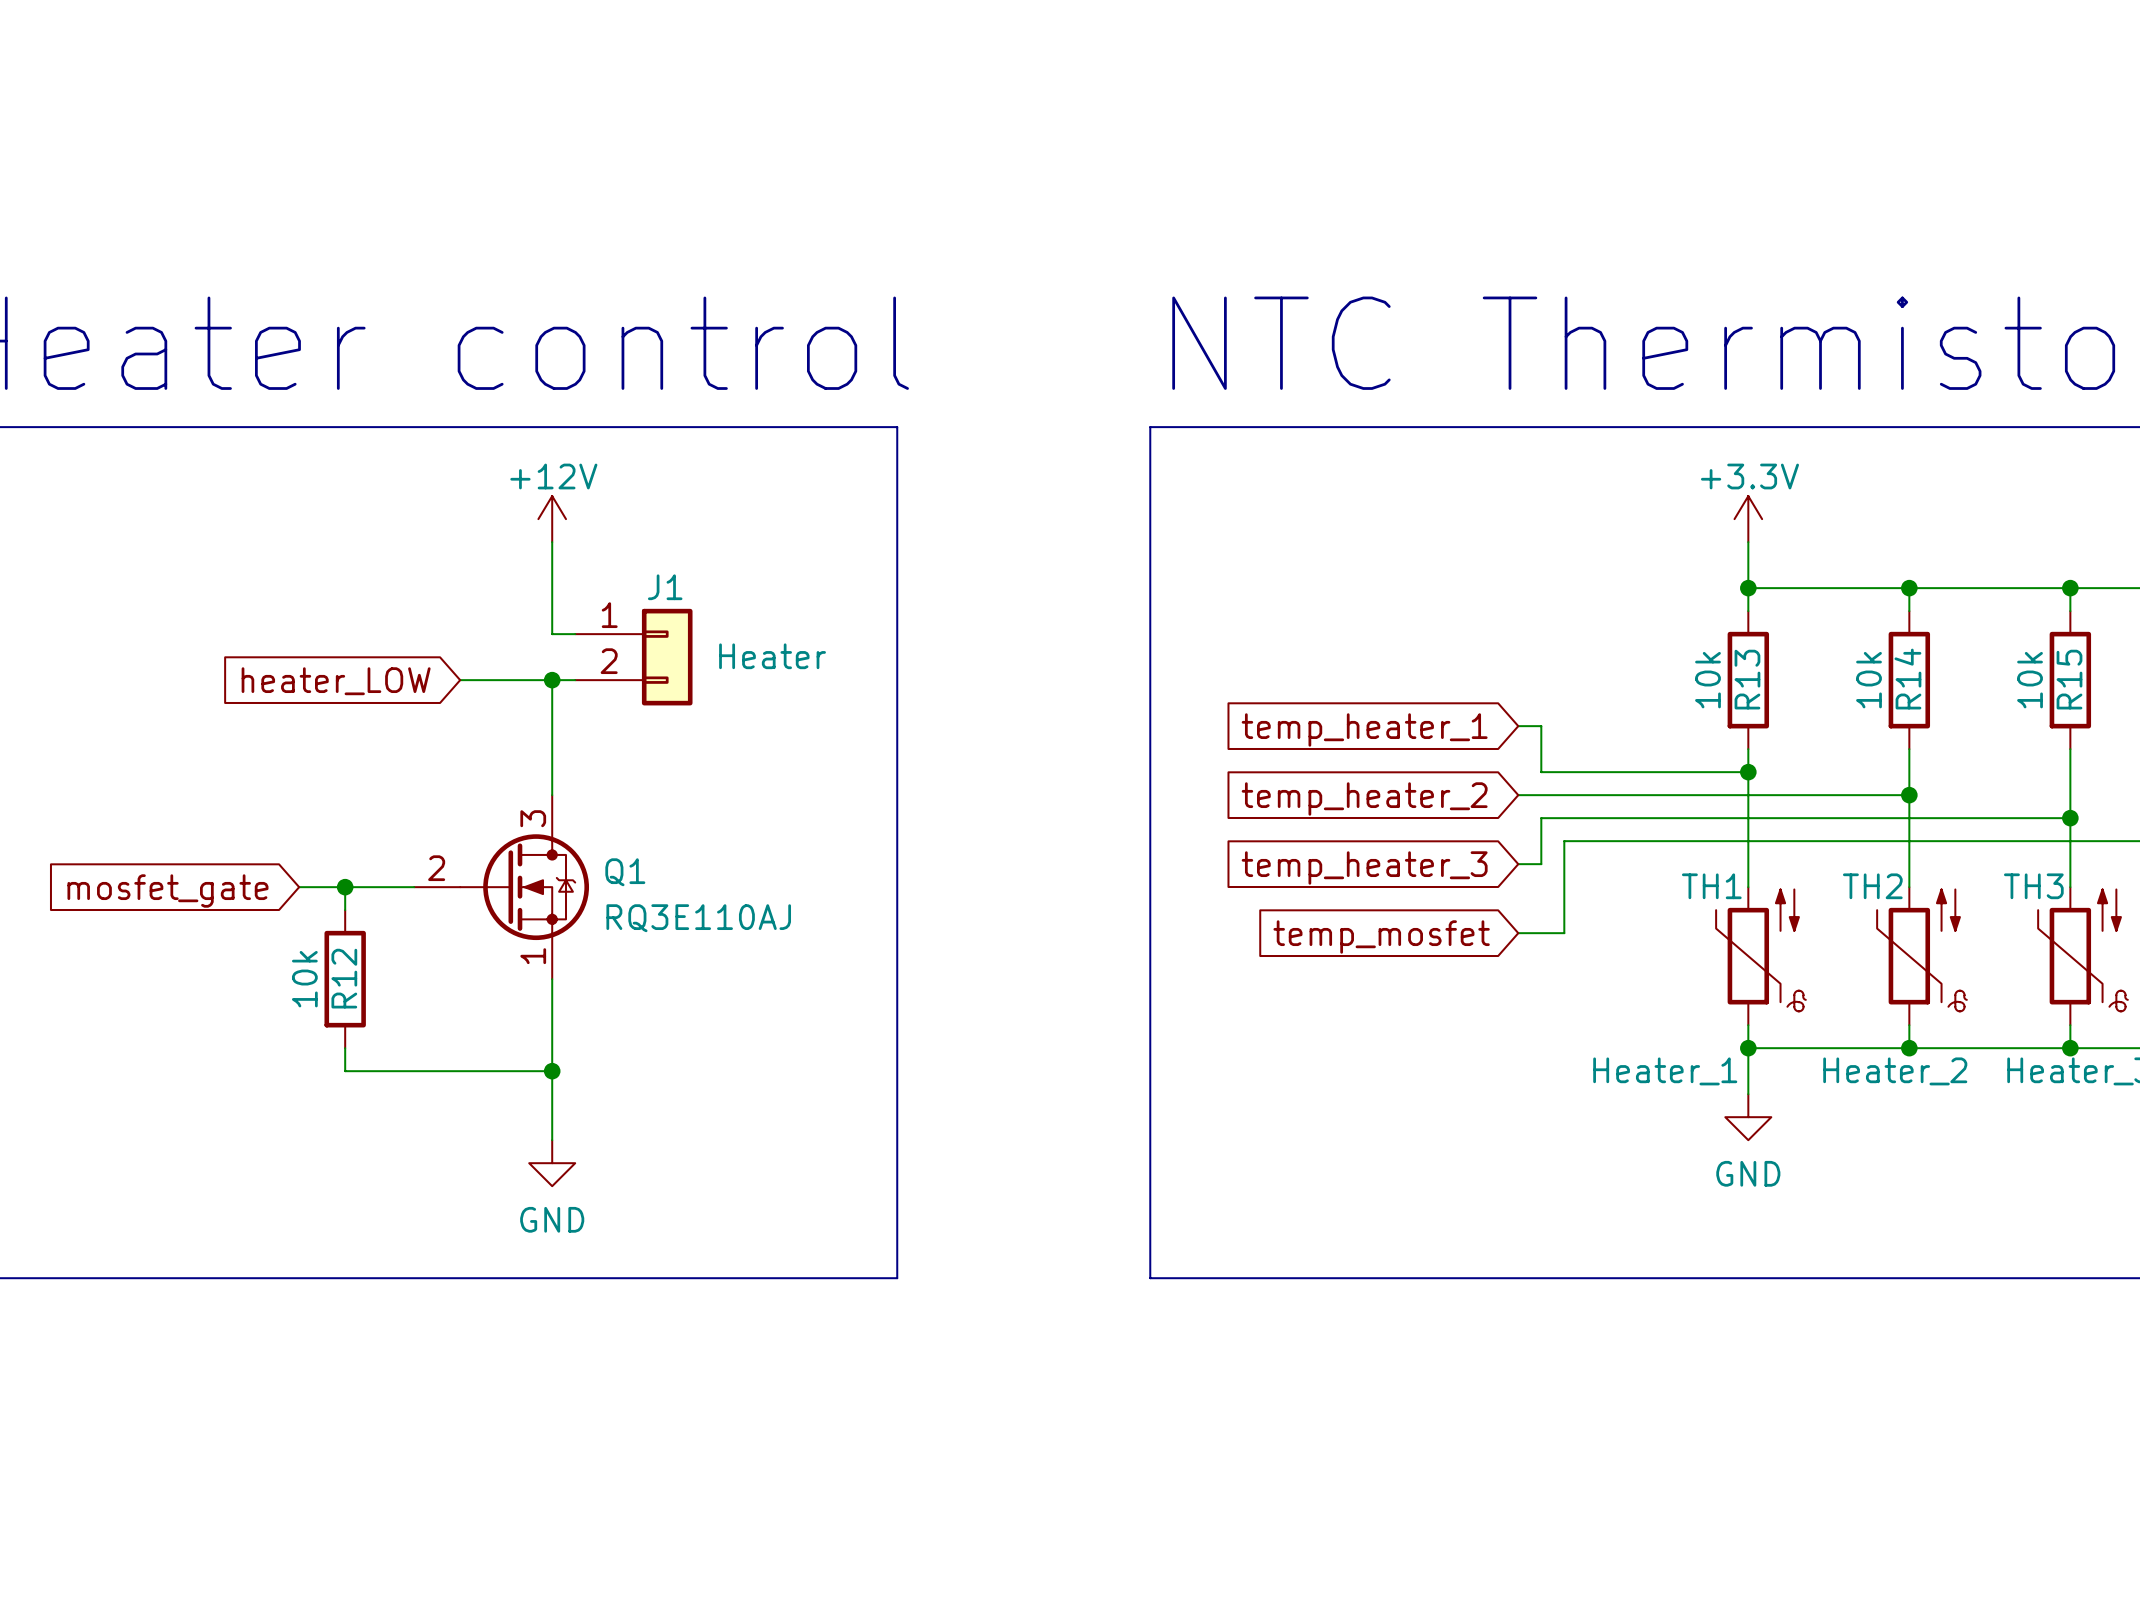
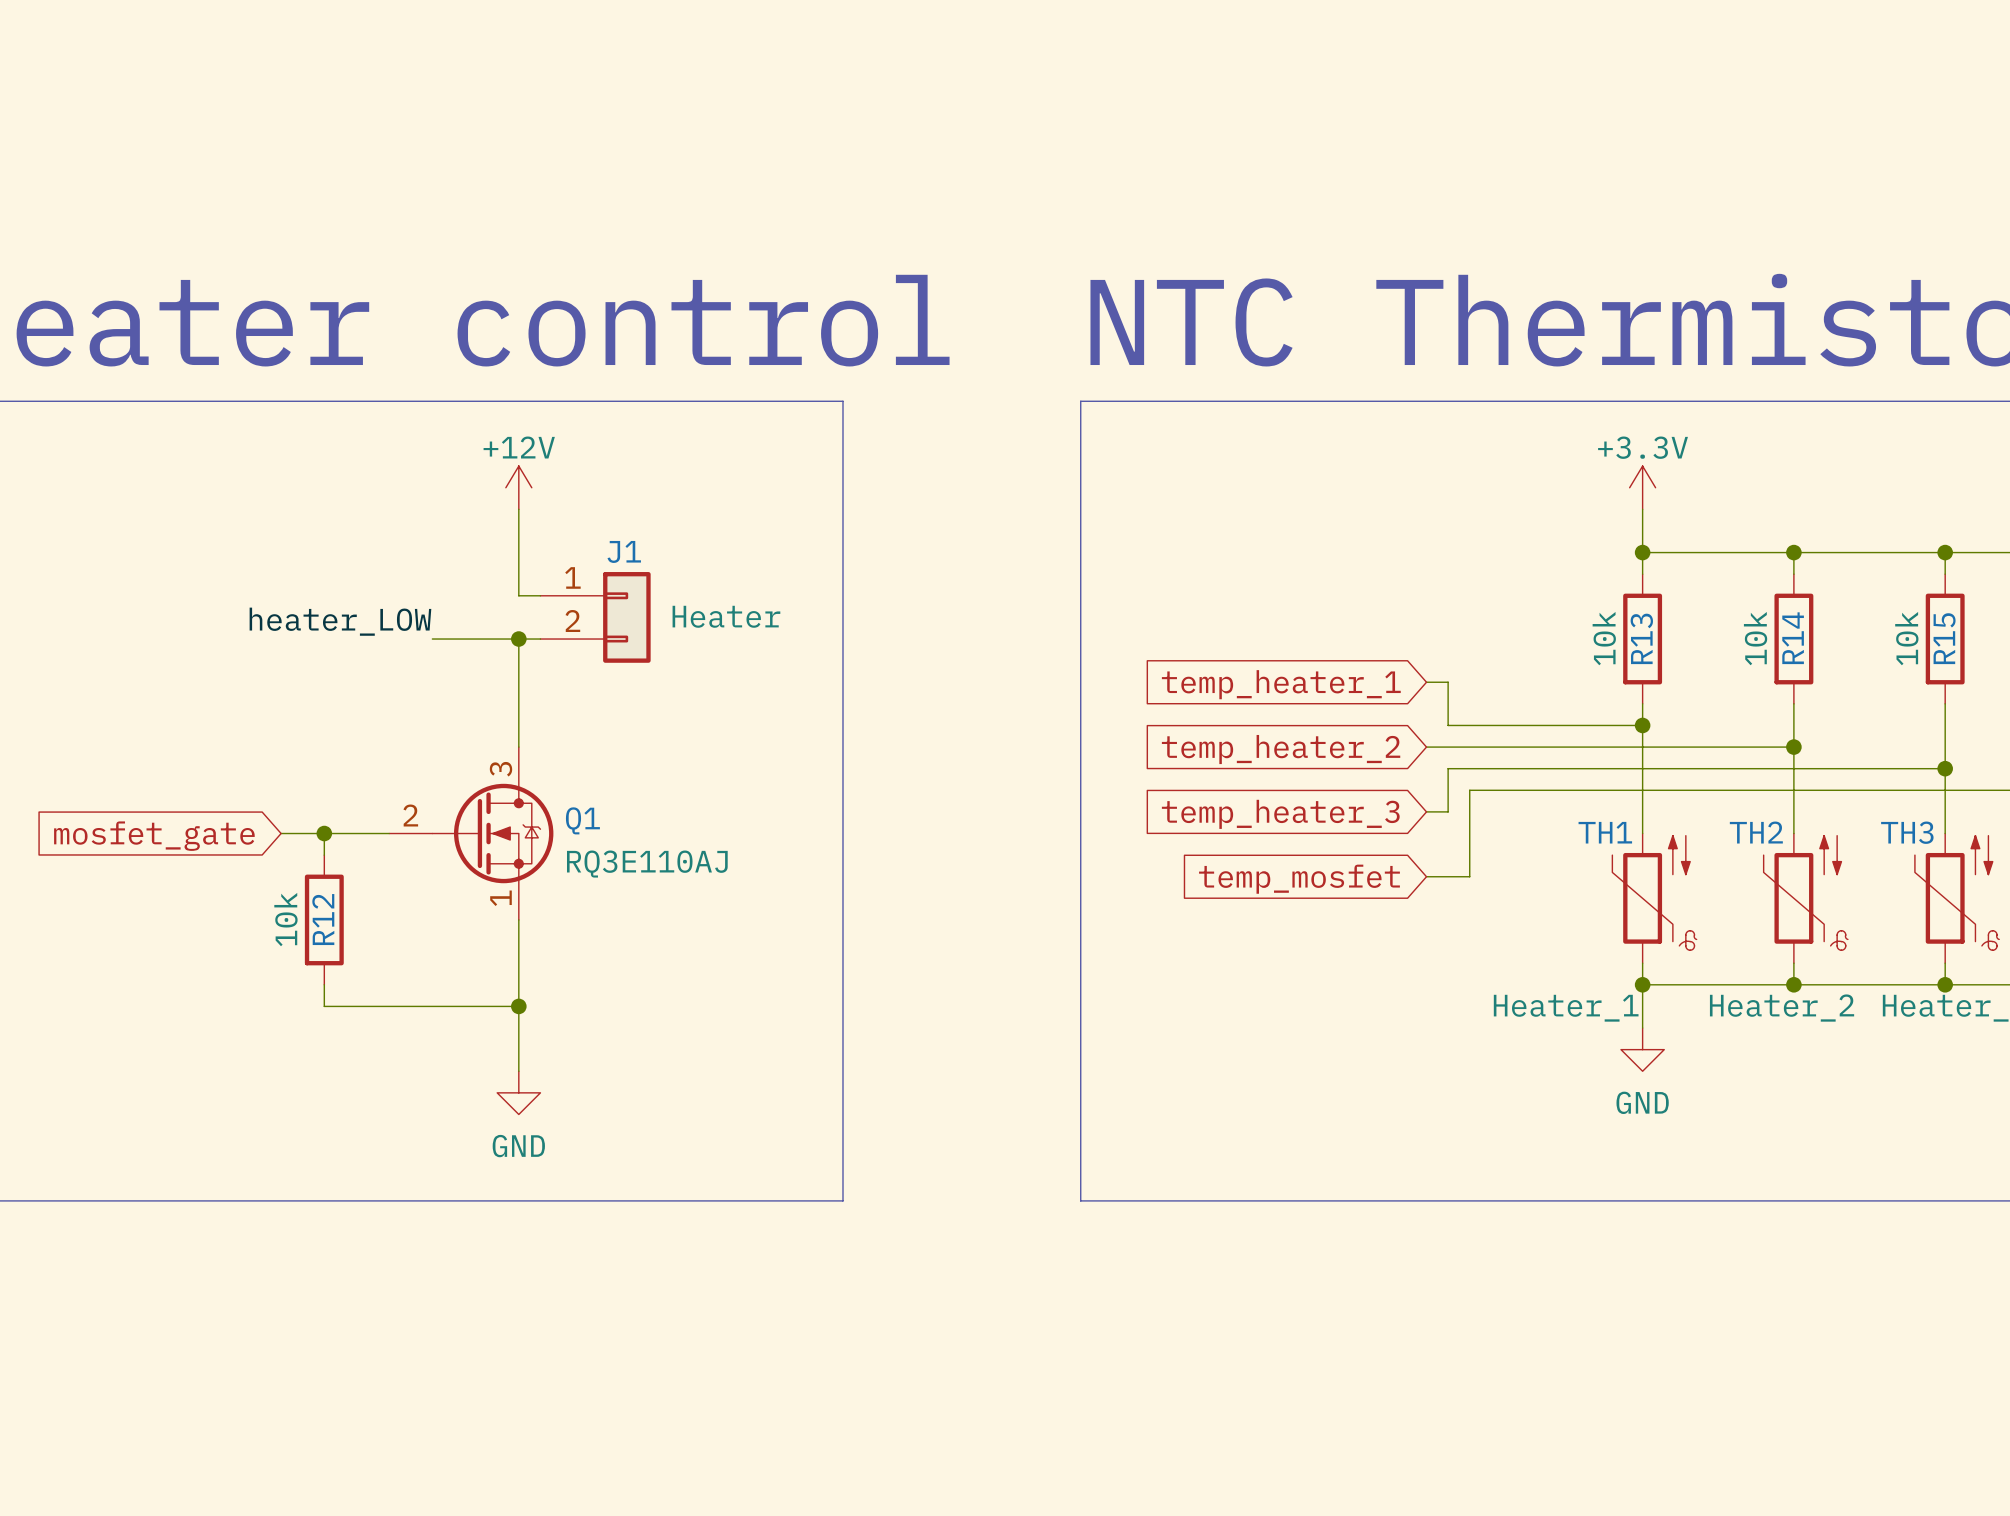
label: none -> heater_LOW (340, 621)
global label: heater_LOW (336, 681) -> none

